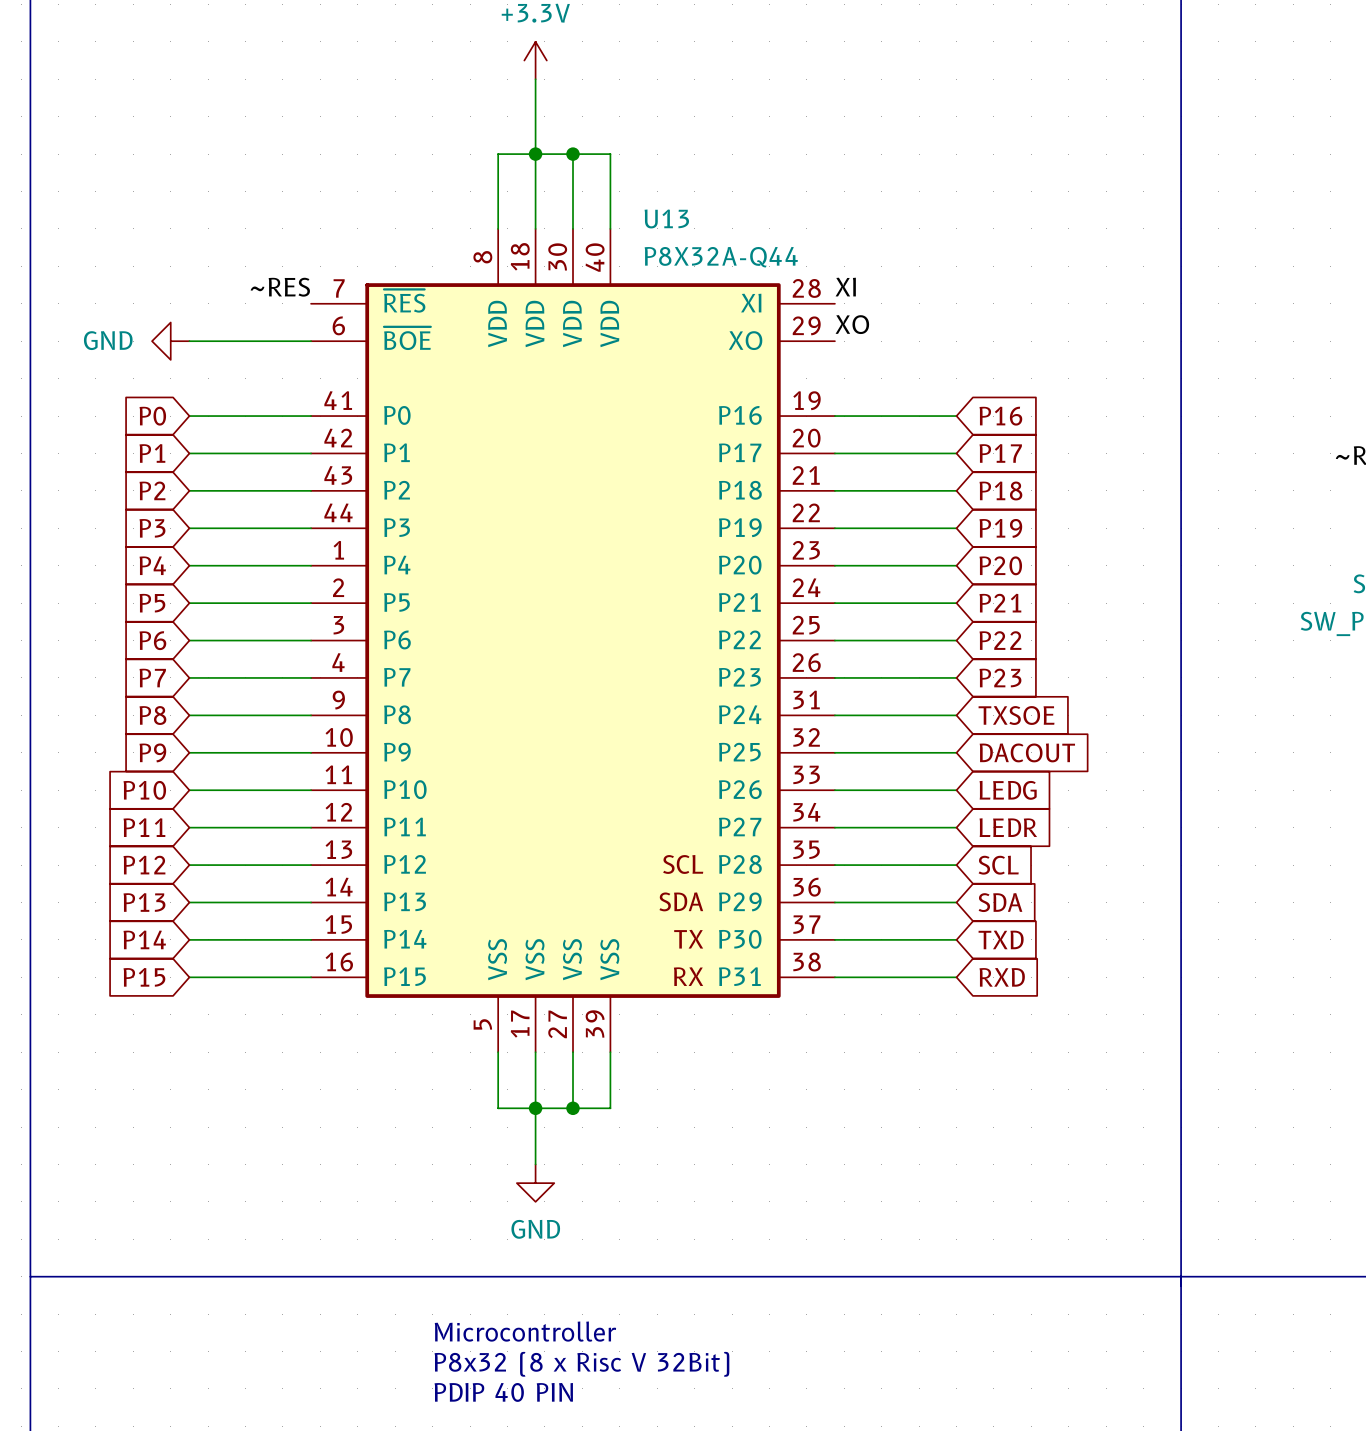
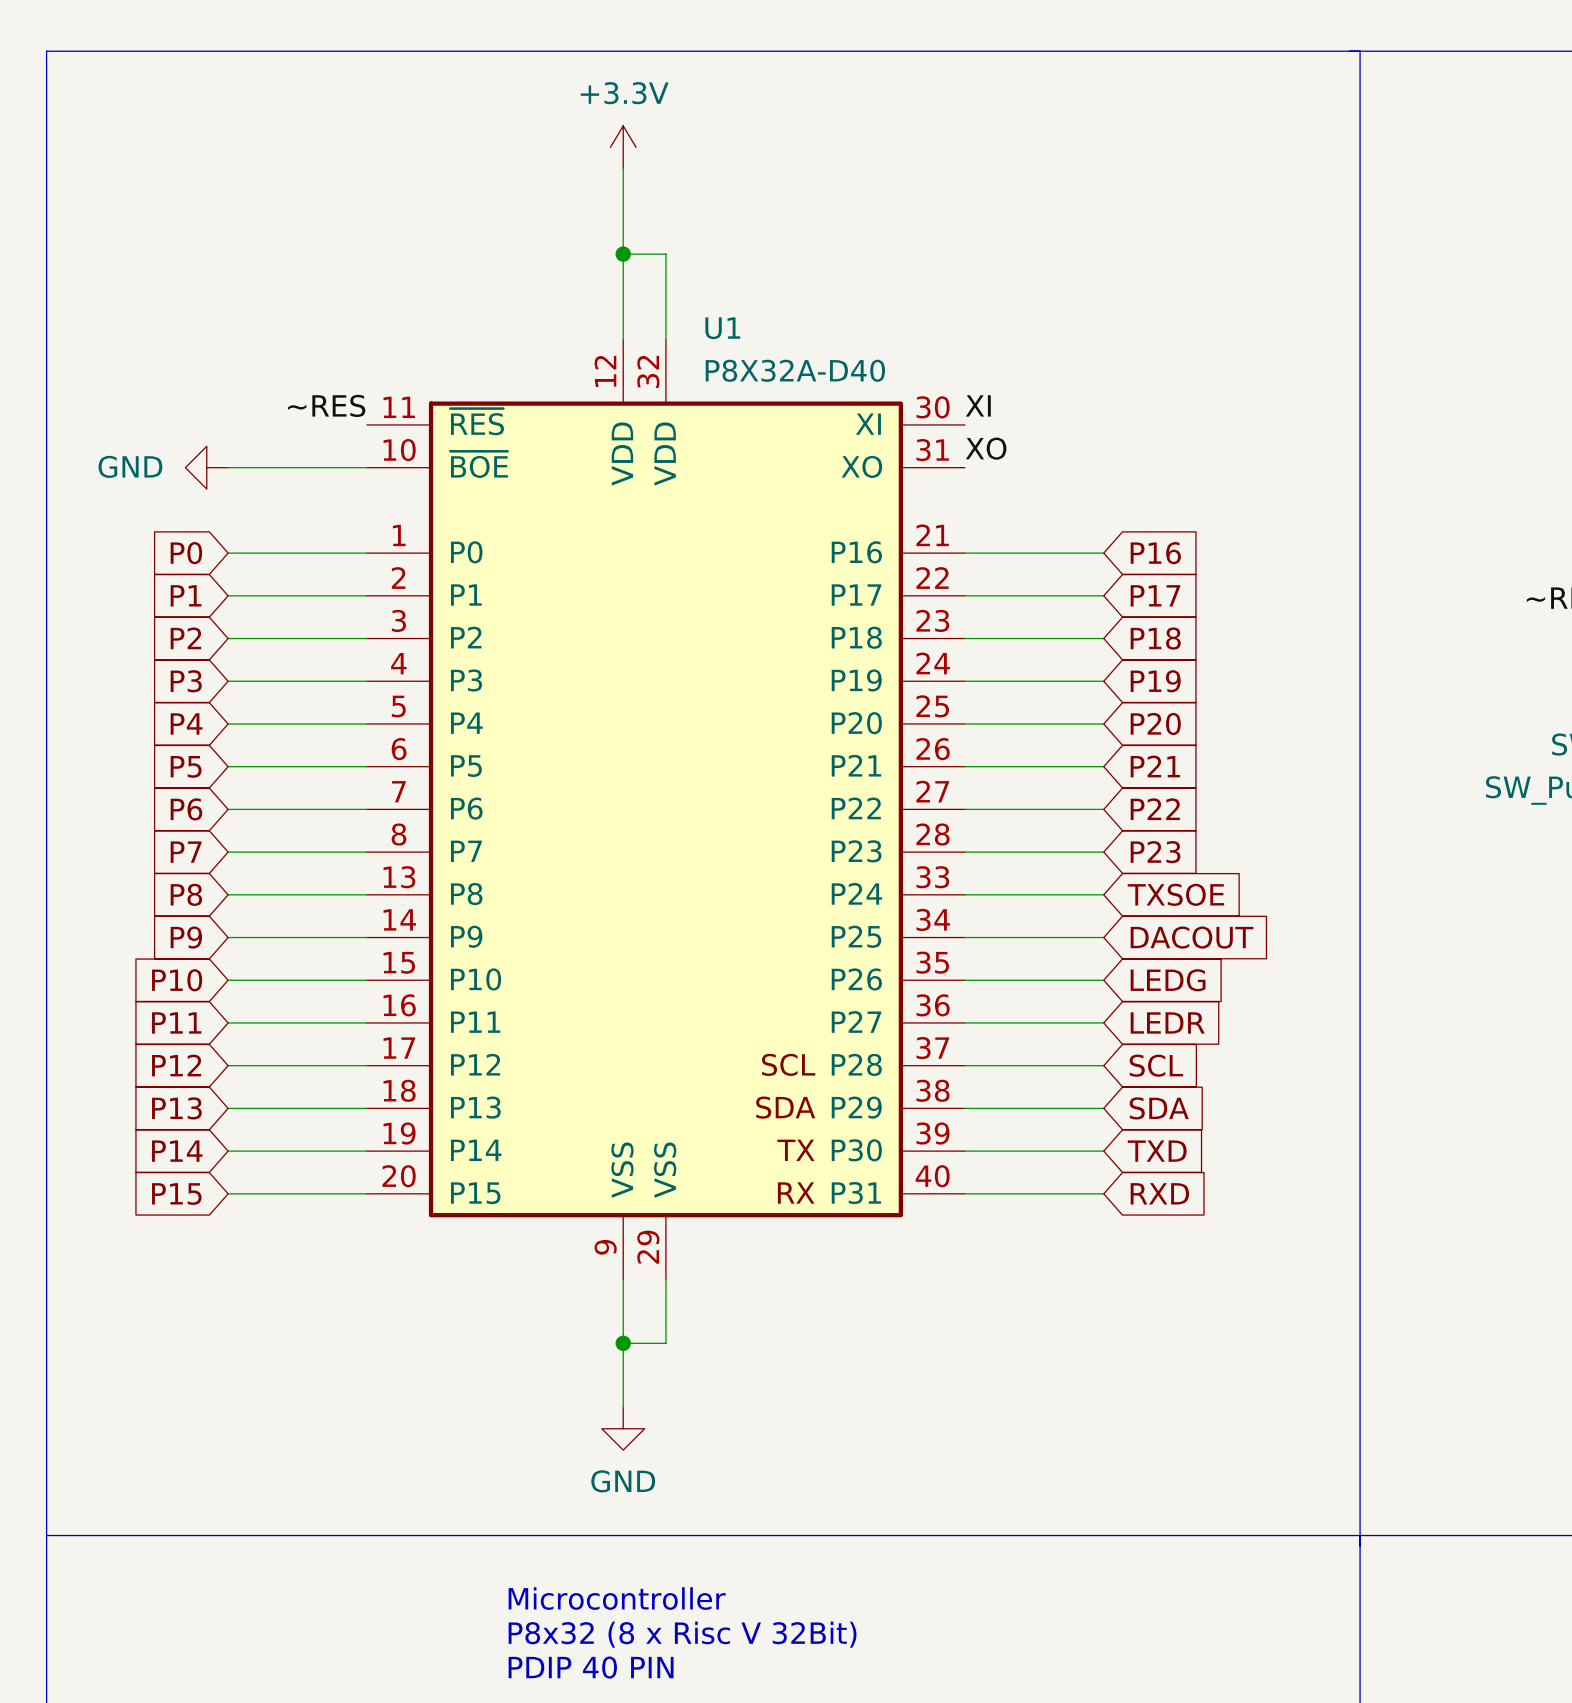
wire: (535, 154) (498, 154) (498, 228) -> none
wire: (573, 154) (610, 154) (610, 228) -> none
junction: (573, 154) -> none
U13: P8X32A-Q44 (573, 640) -> none
U1: none -> P8X32A-D40 (665, 809)
wire: (498, 1052) (498, 1108) (535, 1108) -> none
wire: (610, 1052) (610, 1108) (573, 1108) -> none
junction: (573, 1108) -> none

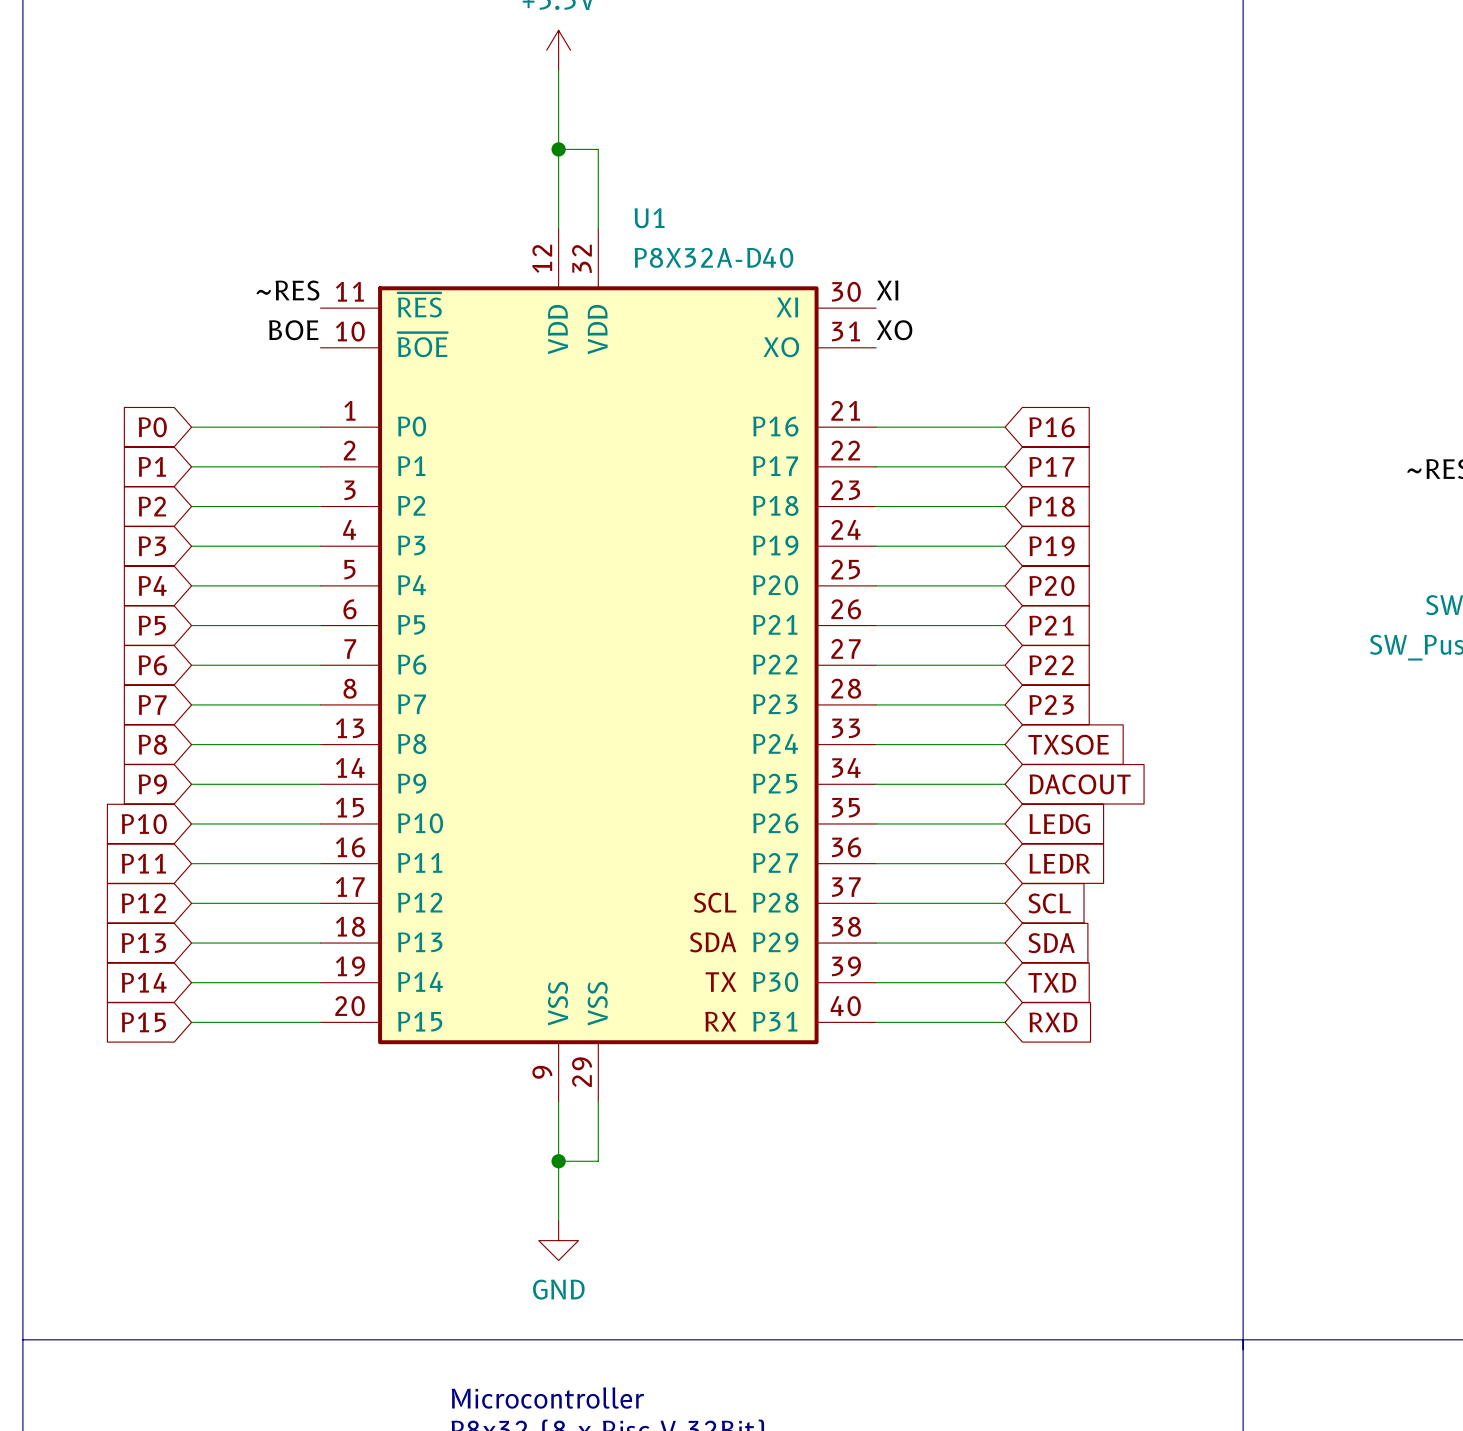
label: none -> BOE (293, 330)
power symbol: GND (206, 467) -> none
wire: (228, 467) (366, 467) -> none

